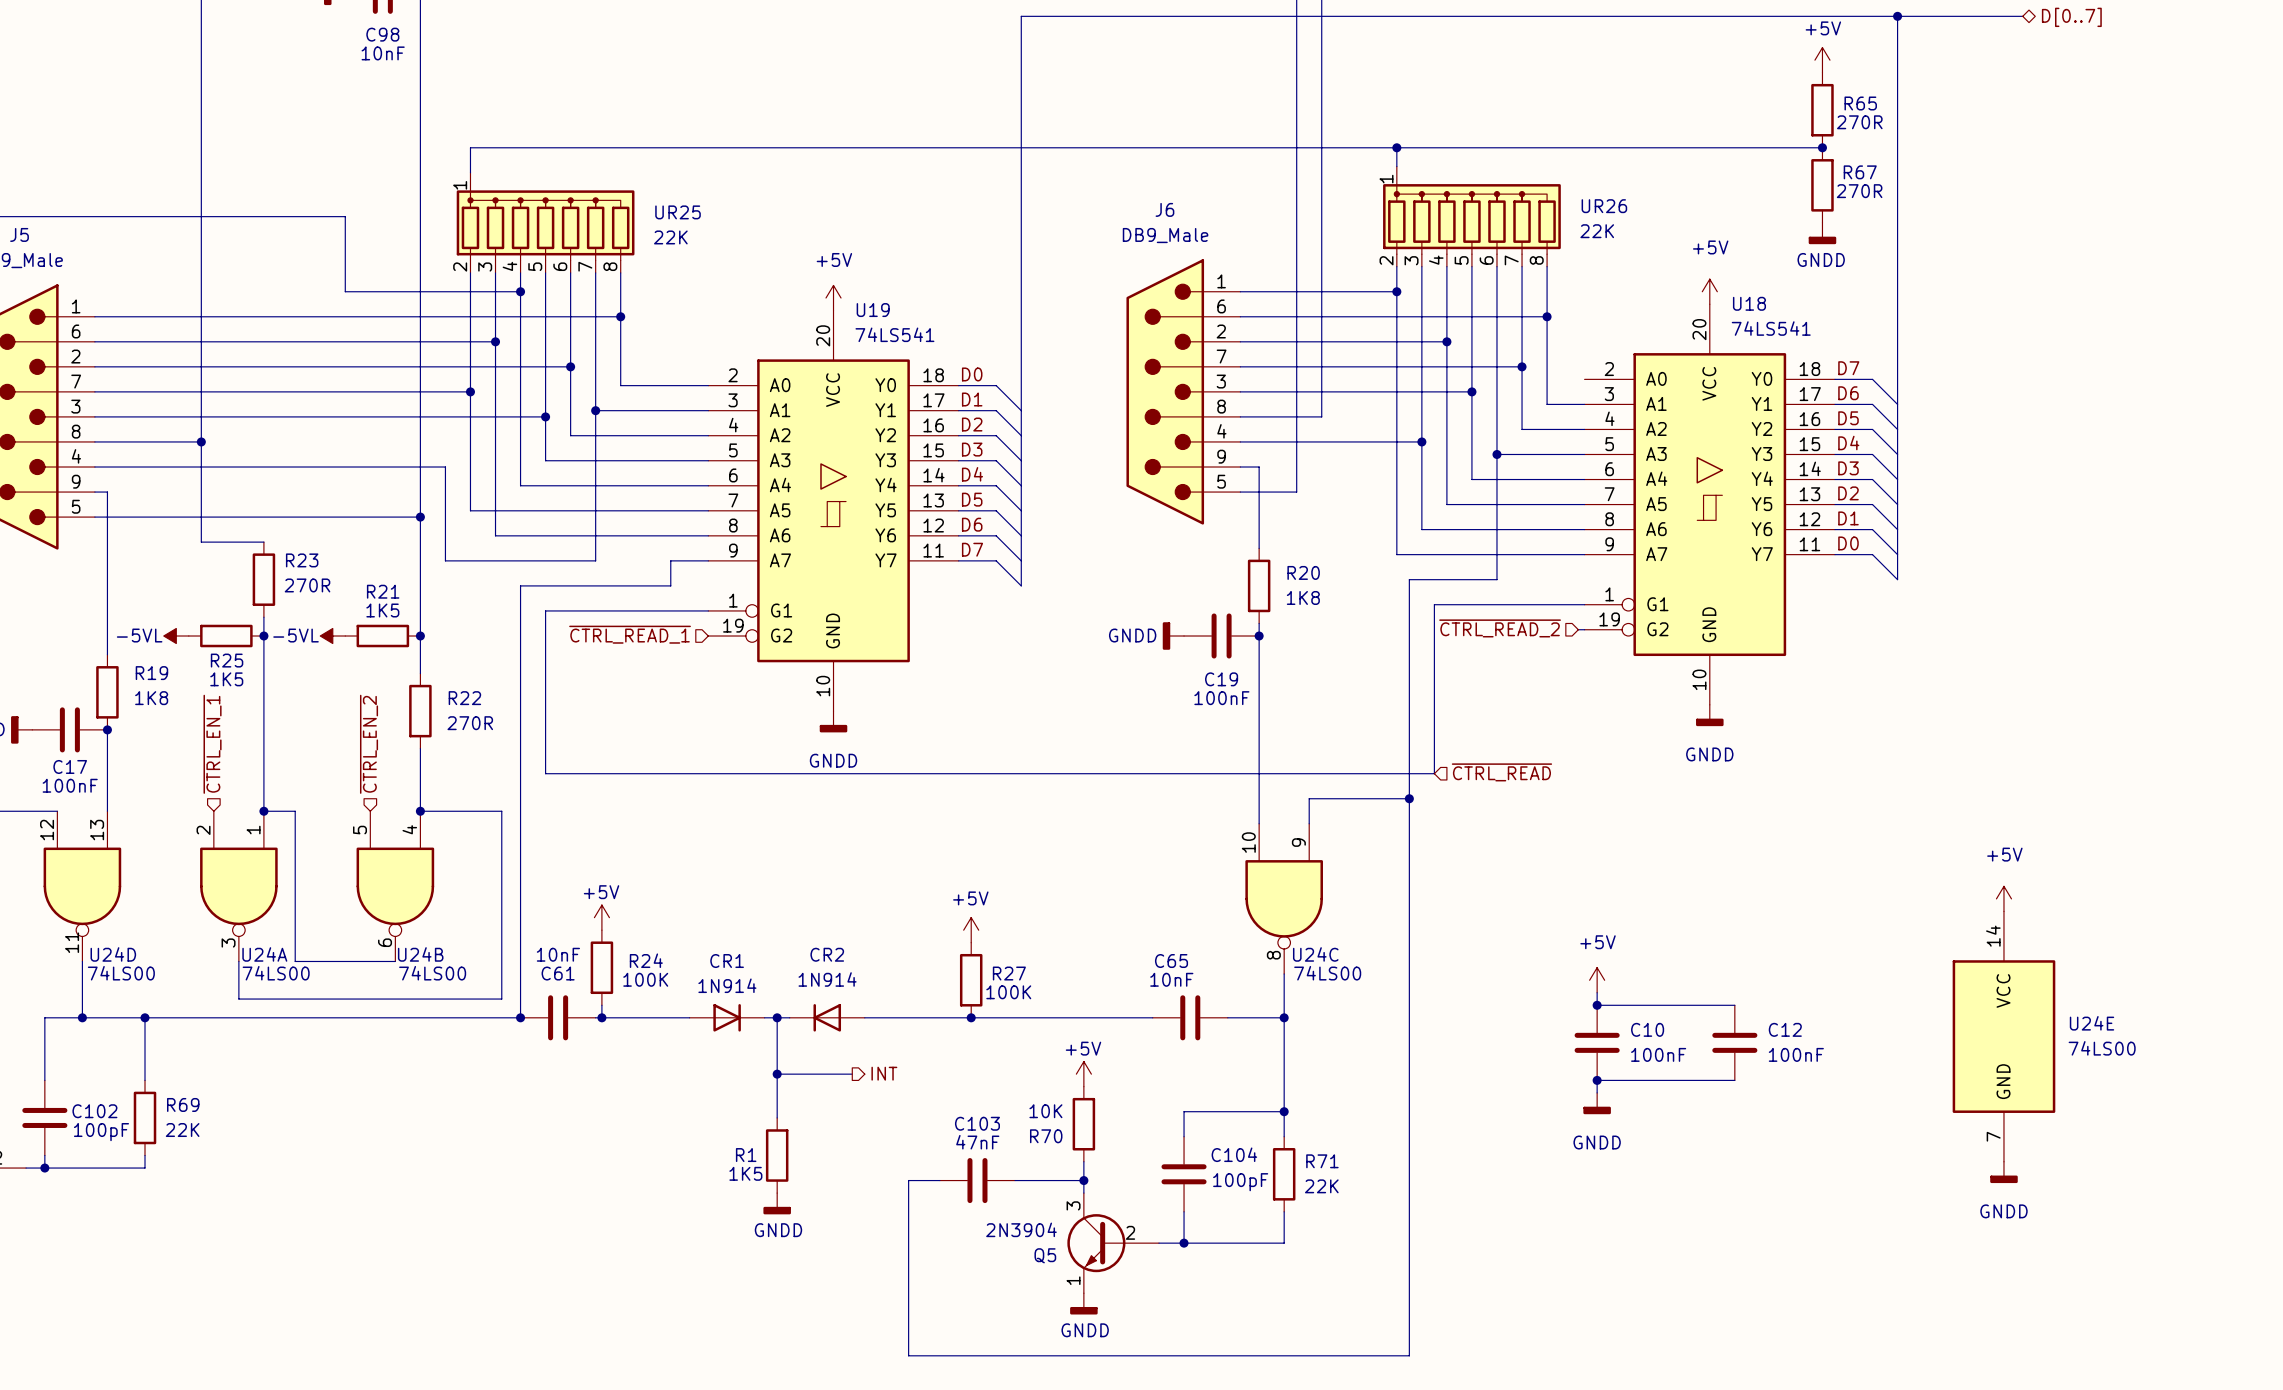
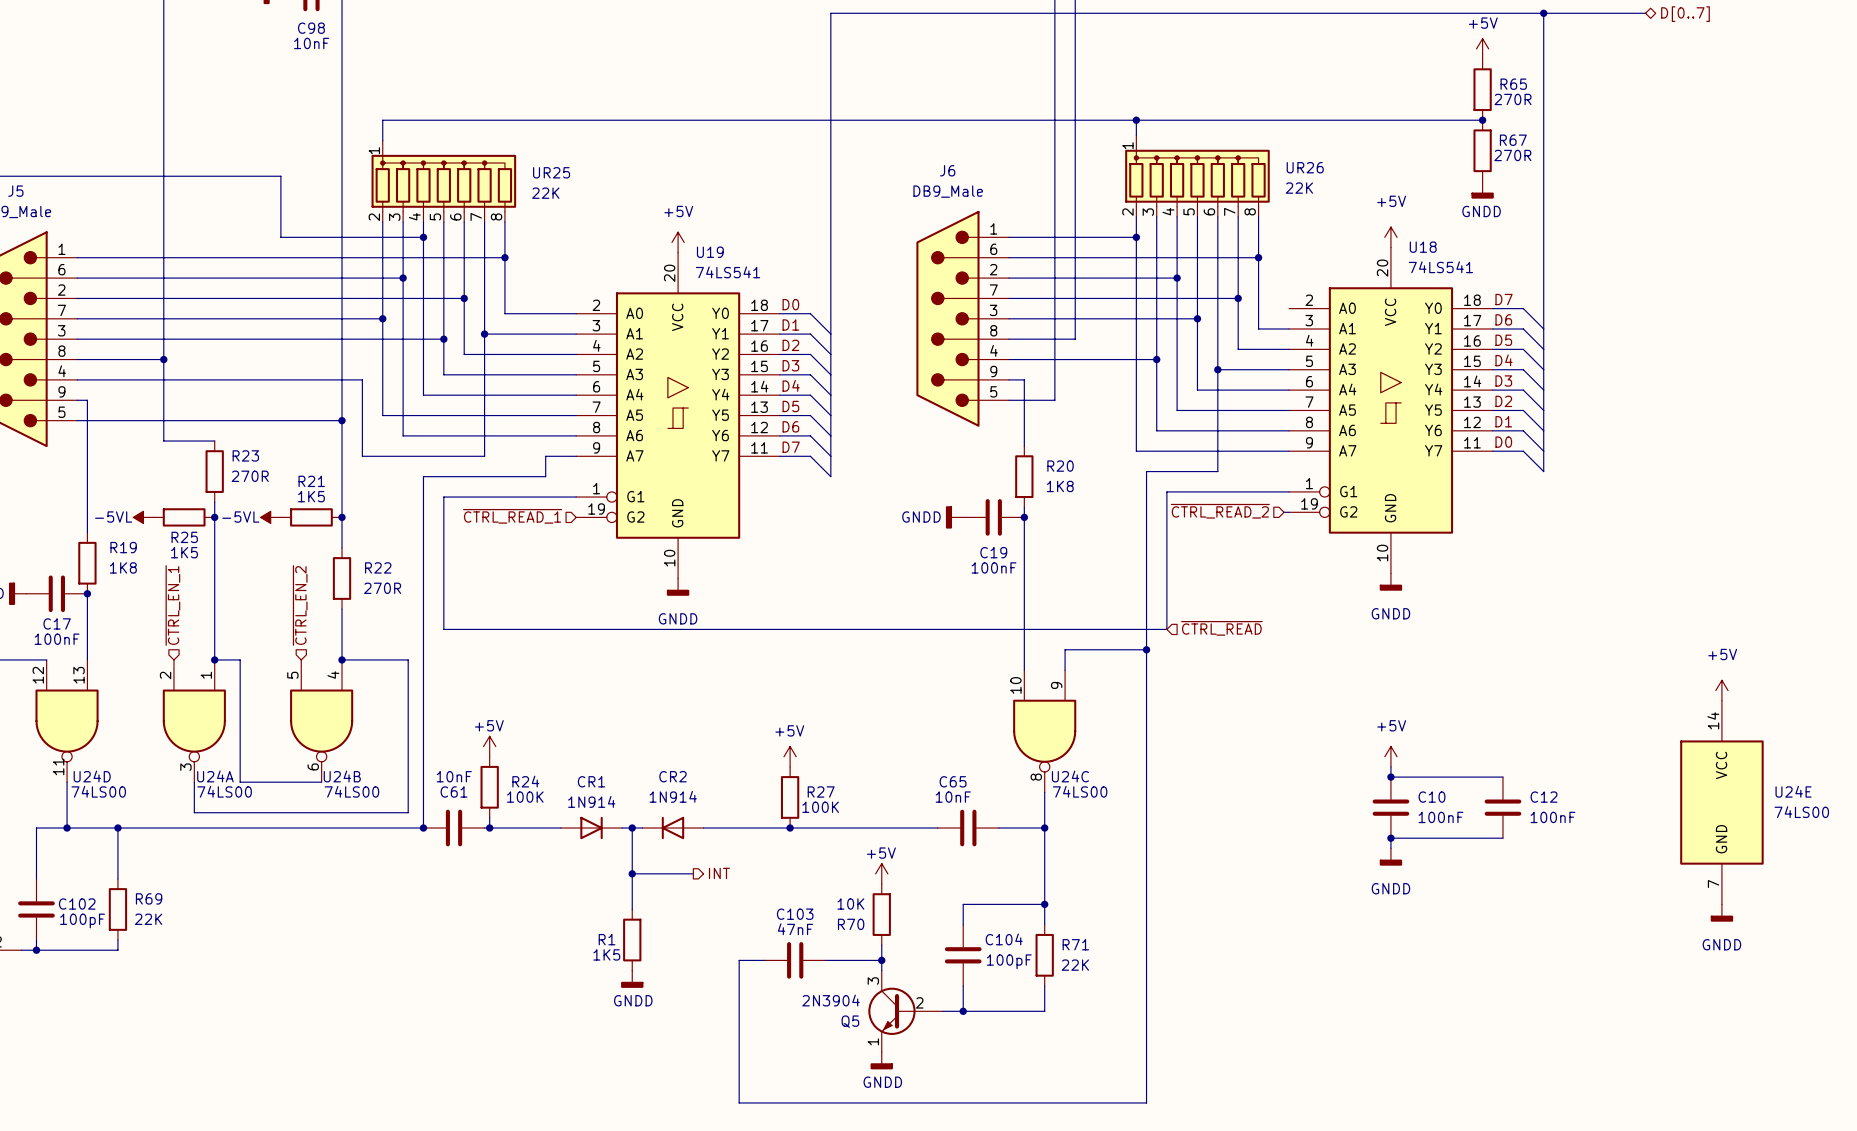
power symbol position: +5V (2003, 898) -> +5V (1721, 690)
junction: none -> (1390, 777)
power symbol position: +5V (1597, 980) -> +5V (1390, 756)
wire: (1597, 992) (1597, 1005) (1734, 1005) -> (1390, 766) (1390, 777) (1502, 777)
junction: (1597, 1005) -> none
junction: none -> (1390, 838)
U24E position: (2003, 1036) -> (1721, 802)
C10 position: (1597, 1042) -> (1390, 807)
C12 position: (1734, 1042) -> (1502, 807)
junction: (1597, 1080) -> none
wire: (1734, 1080) (1597, 1080) (1597, 1092) -> (1502, 838) (1390, 838) (1390, 848)
power symbol position: GNDD (1597, 1103) -> GNDD (1390, 857)
power symbol position: GNDD (2003, 1172) -> GNDD (1721, 913)

